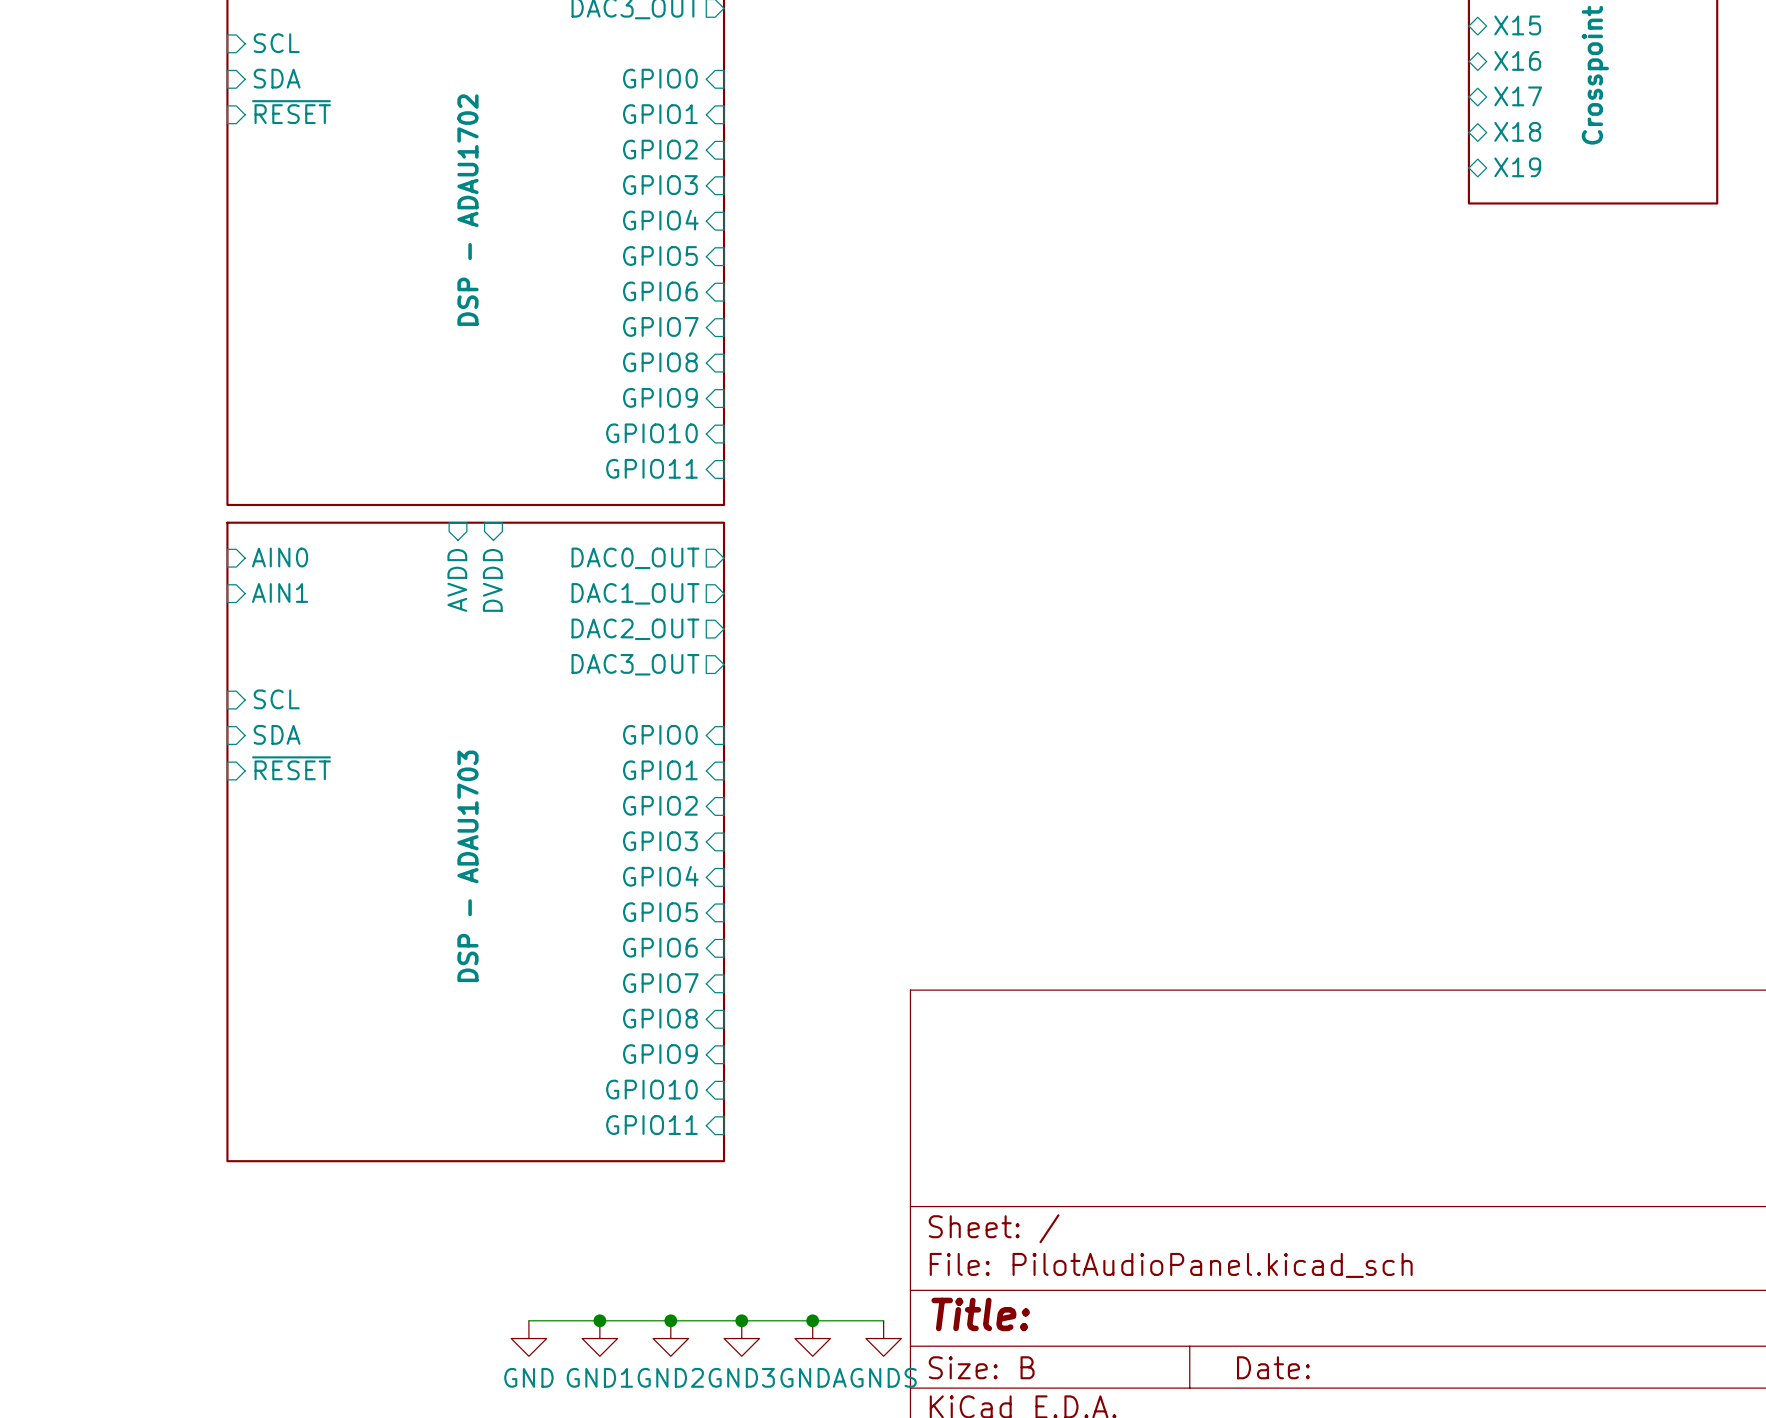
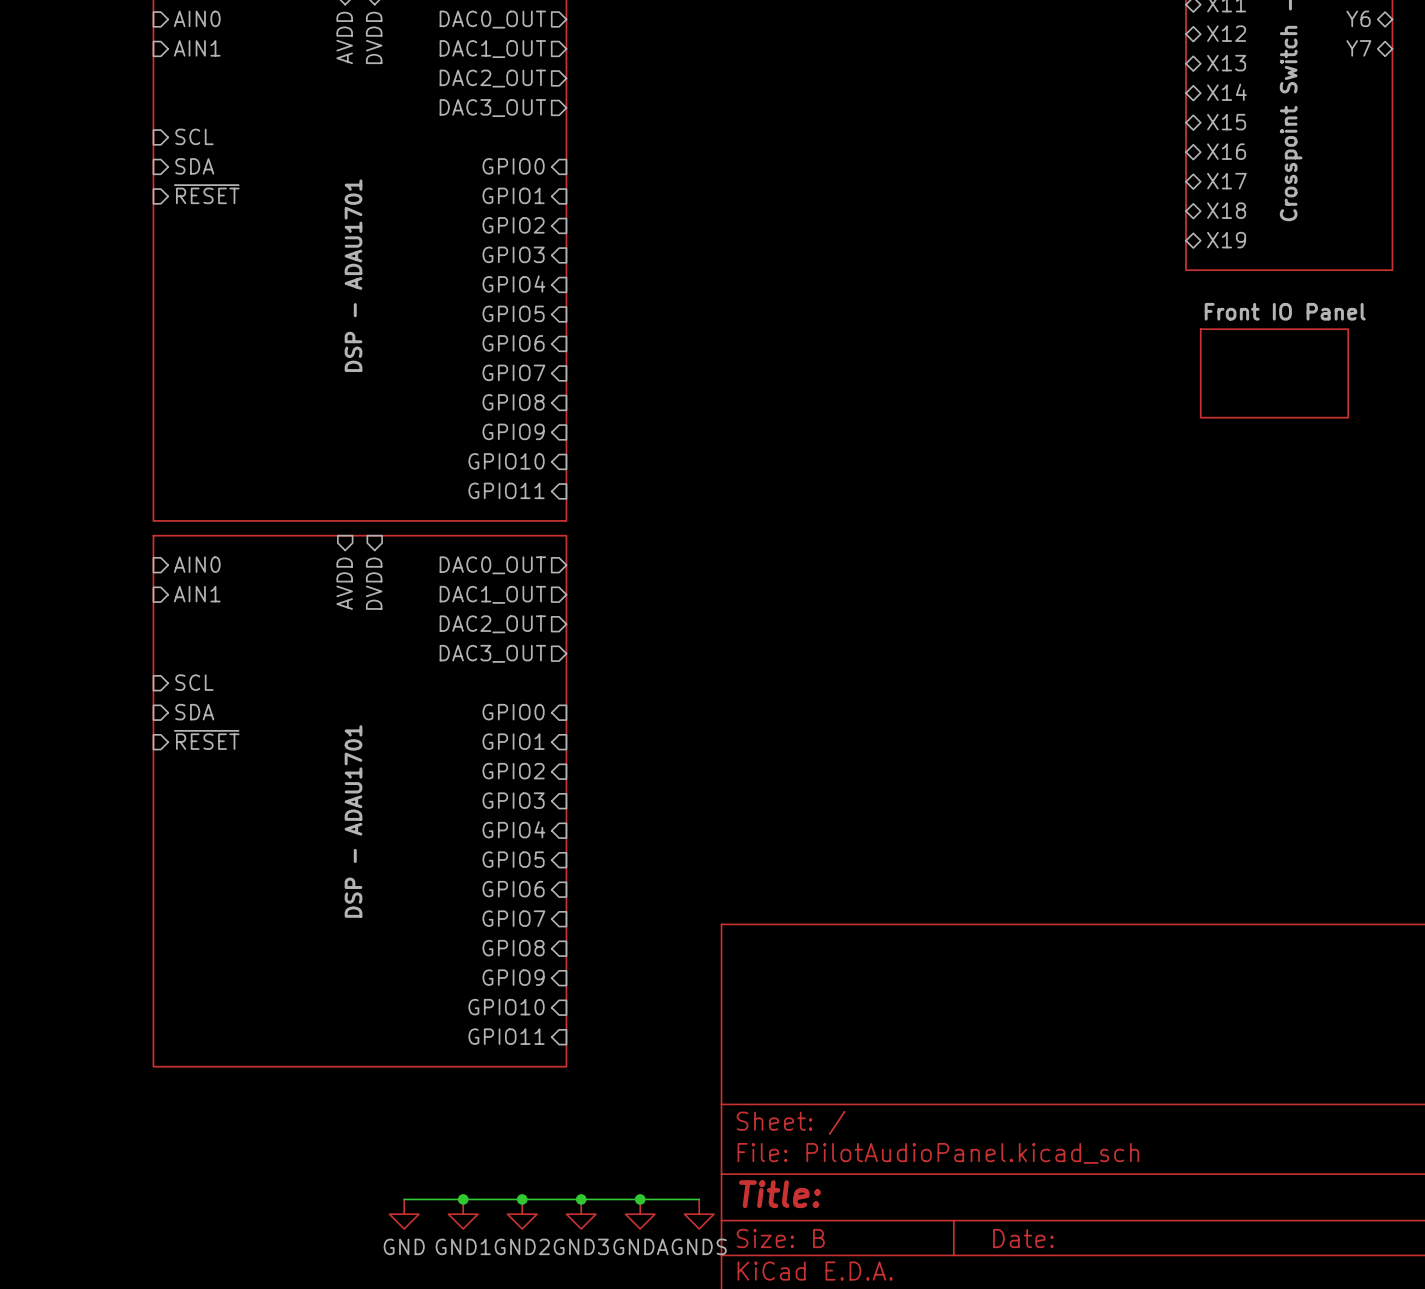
sheet DSP - ADAU1702 name: DSP - ADAU1702 (467, 210) -> DSP - ADAU1701 (353, 275)
sheet Front IO Panel: none -> (1274, 373)
sheet DSP - ADAU1703 name: DSP - ADAU1703 (467, 866) -> DSP - ADAU1701 (353, 821)

